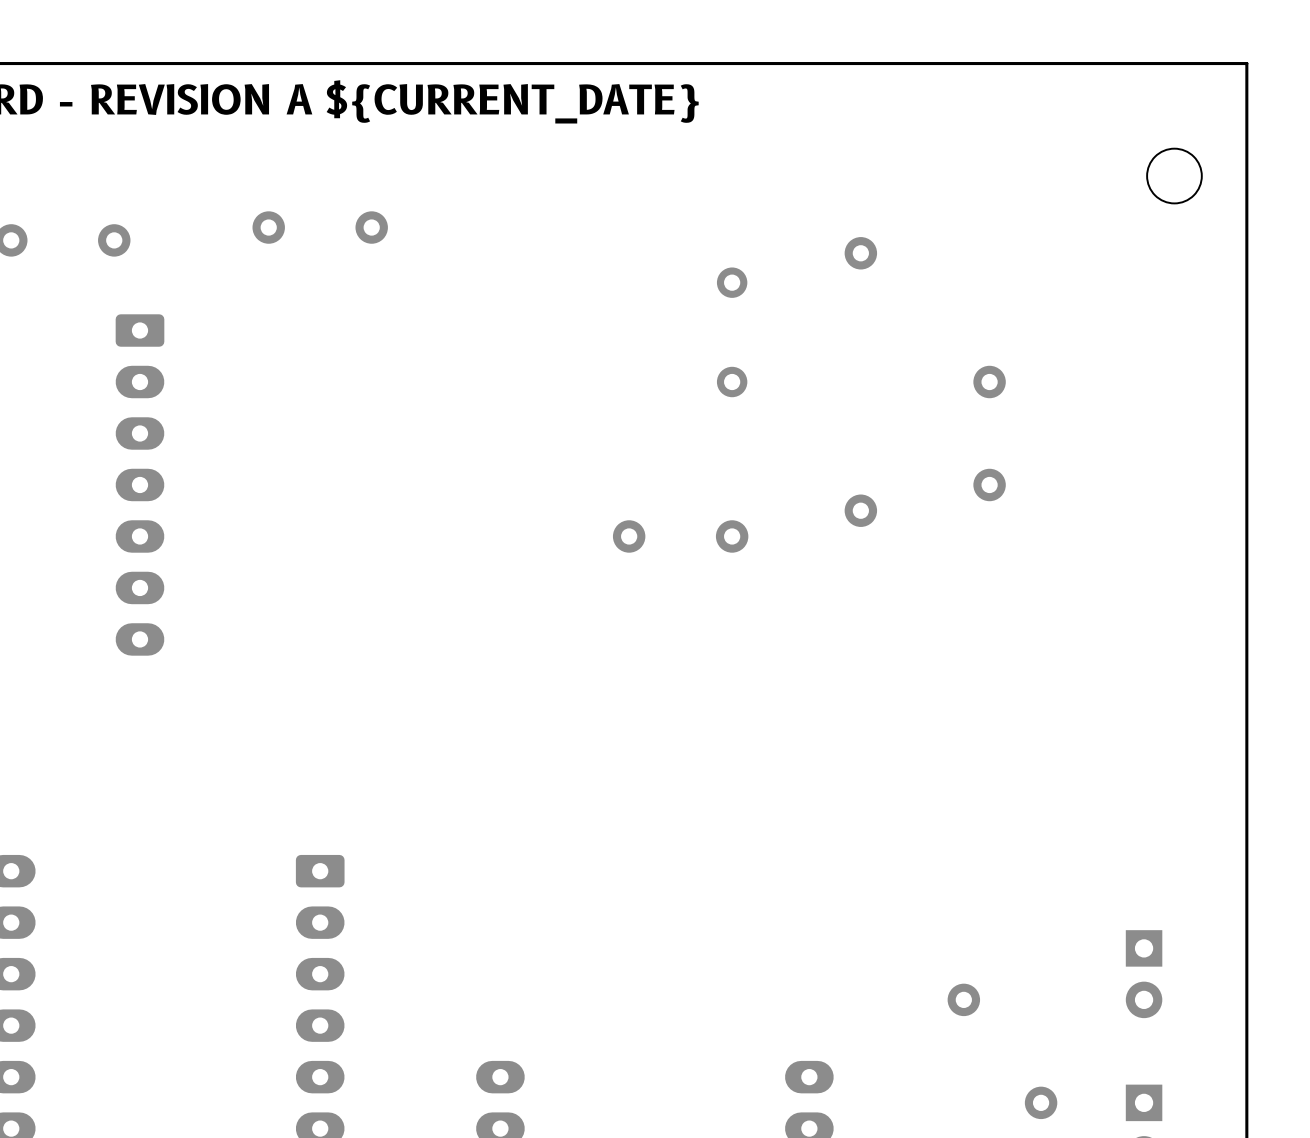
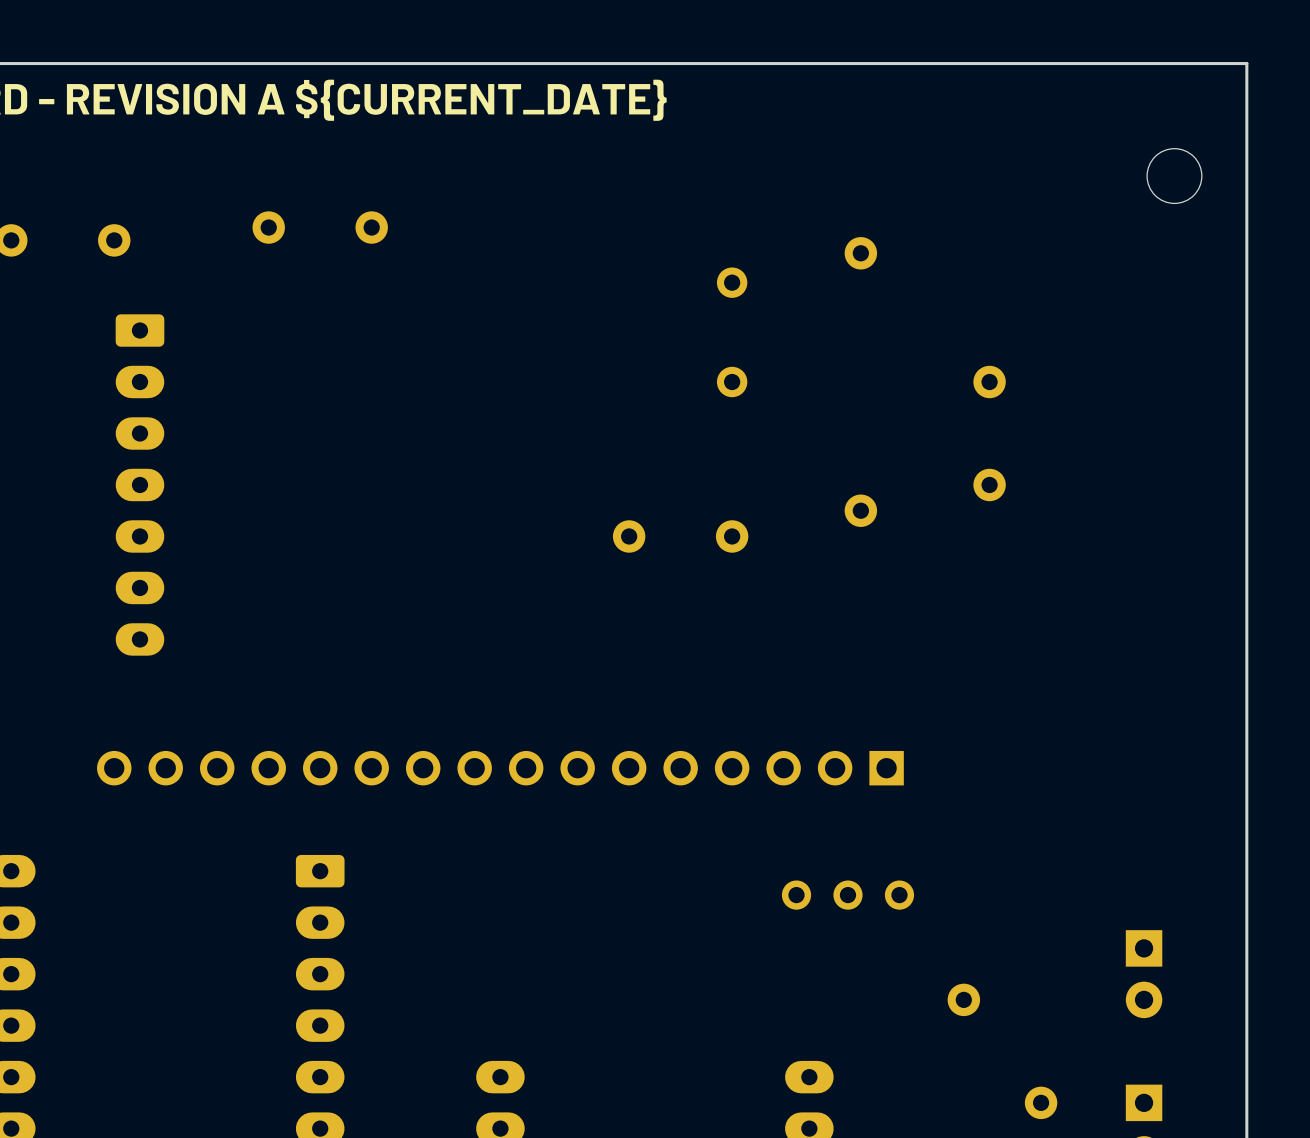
part: none -> (500, 768)
part: none -> (847, 895)

